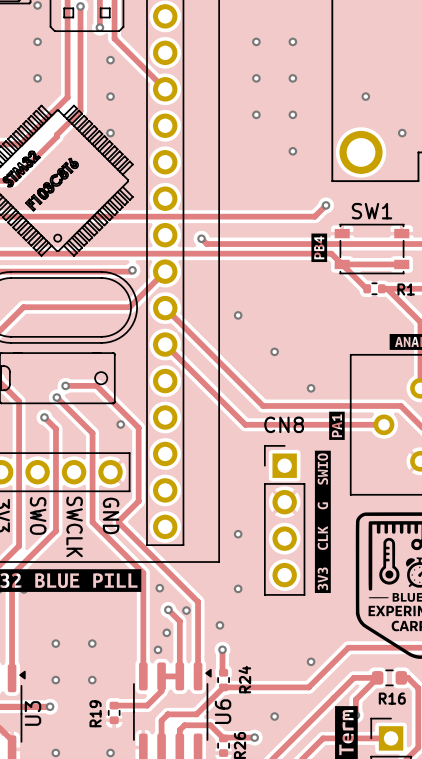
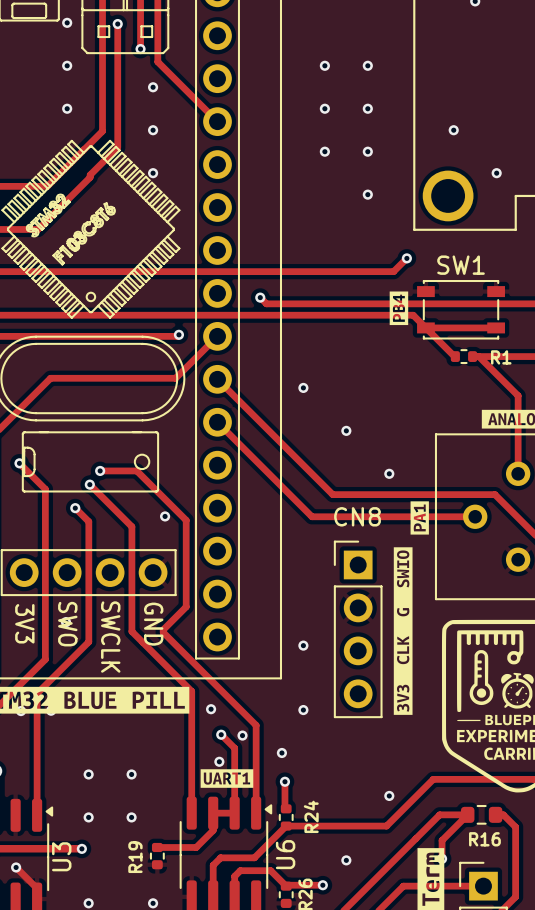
drawing: none -> [200, 769, 254, 788]
via: (158, 649) -> none

